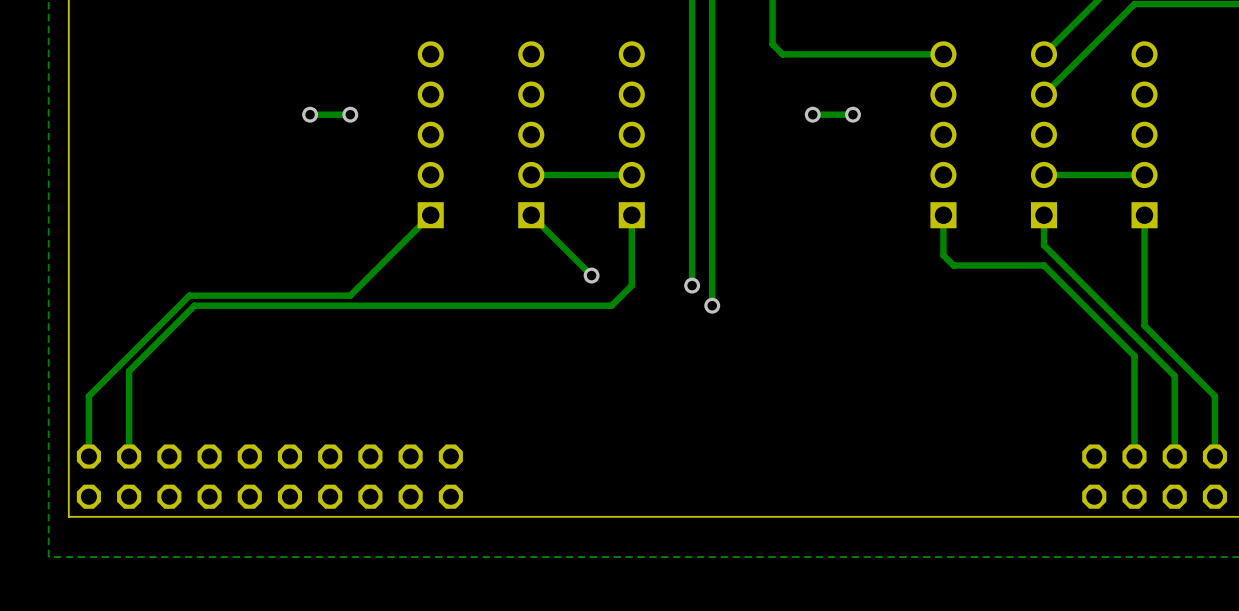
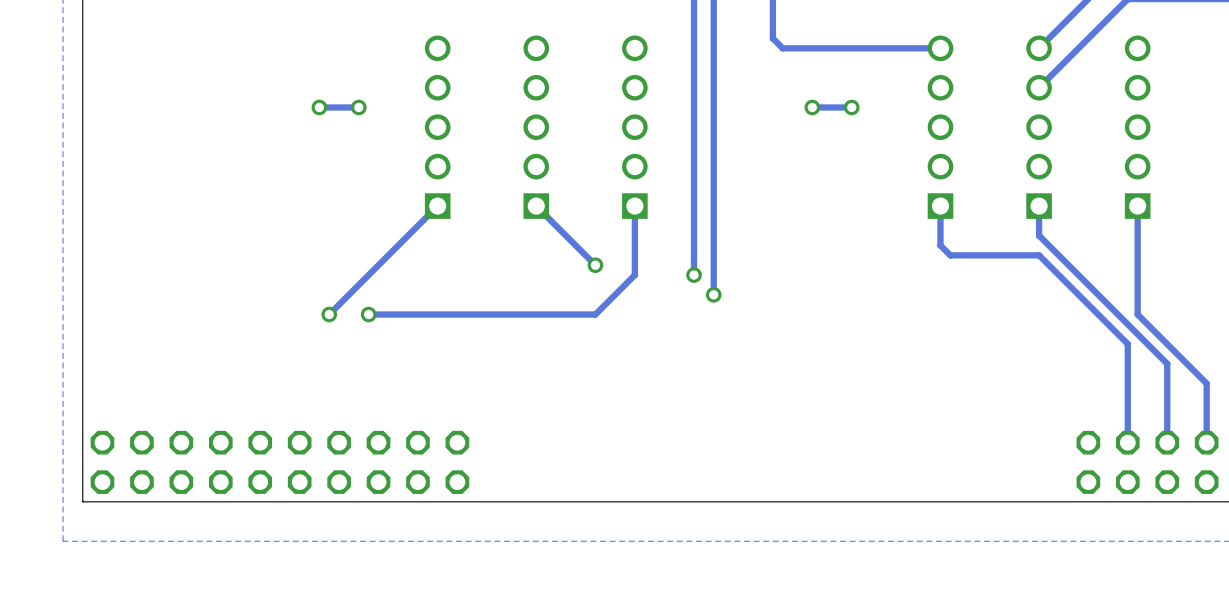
track: (631, 175) (531, 175) -> none
track: (1144, 175) (1044, 175) -> none
track: (350, 295) (189, 295) (88, 396) (88, 456) -> (358, 284) (329, 314)
track: (611, 305) (194, 305) (129, 371) (129, 456) -> (615, 294) (595, 314) (368, 314)
via: none -> (329, 314)
via: none -> (368, 314)

